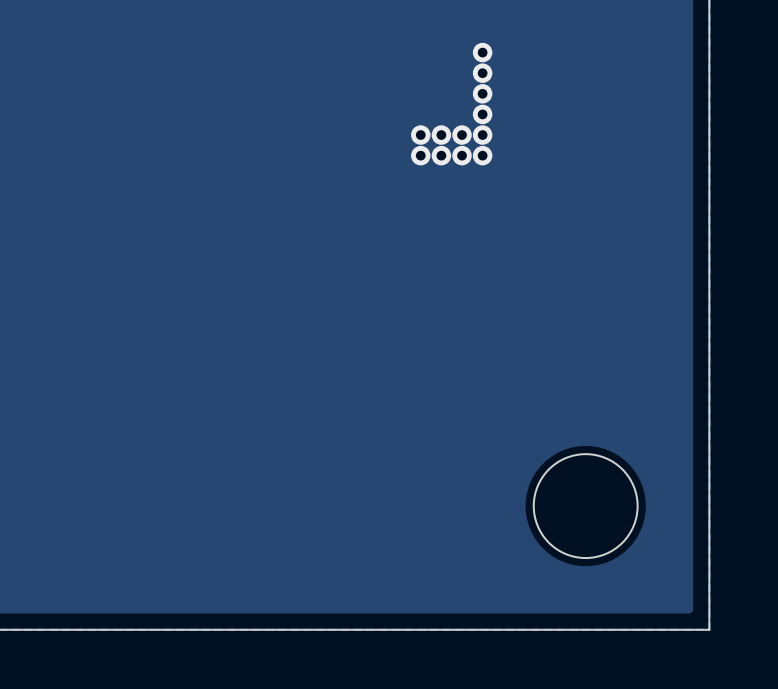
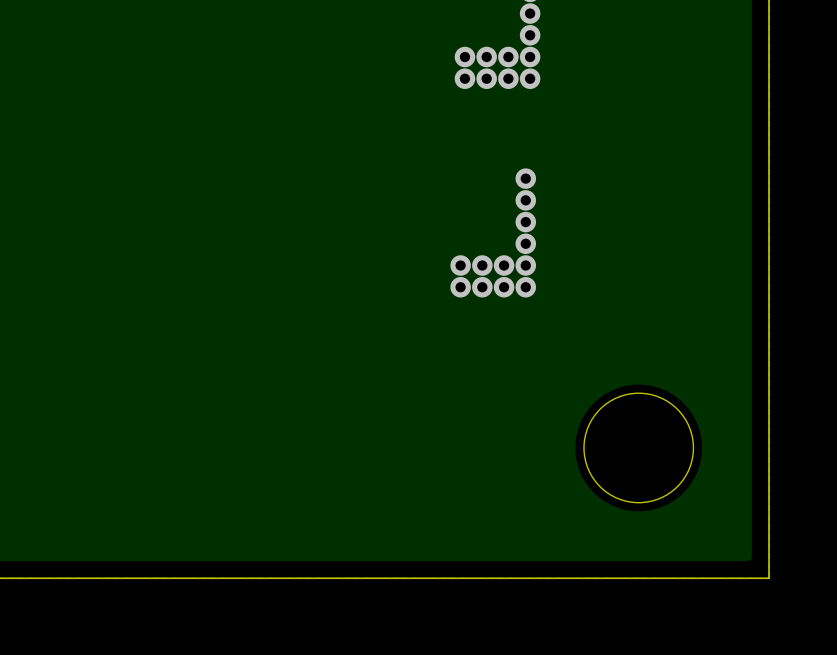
via: none -> (525, 178)
via: none -> (525, 200)
via: none -> (525, 222)
via: none -> (525, 243)
via: none -> (460, 265)
via: none -> (482, 265)
via: none -> (504, 265)
via: none -> (525, 265)
via: none -> (460, 287)
via: none -> (482, 287)
via: none -> (504, 287)
via: none -> (525, 287)

